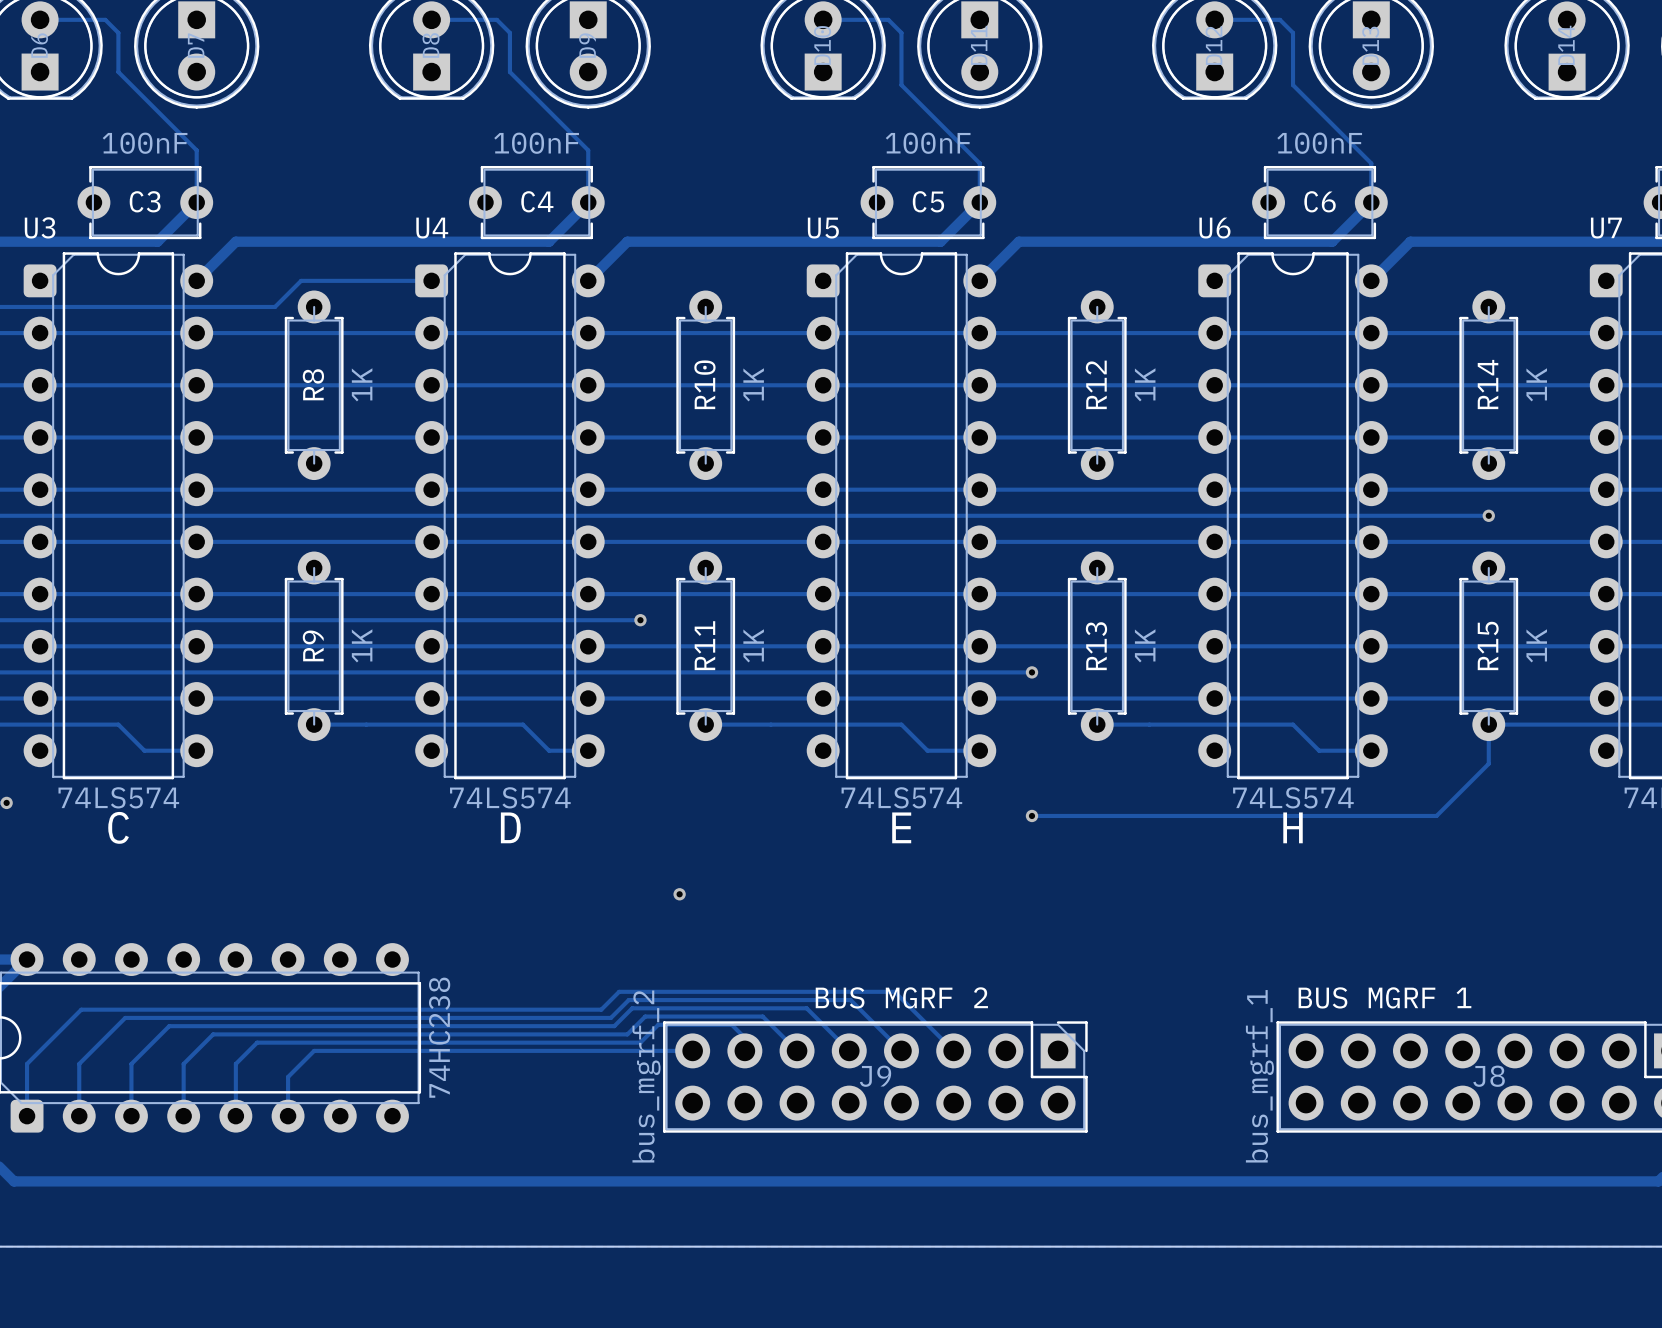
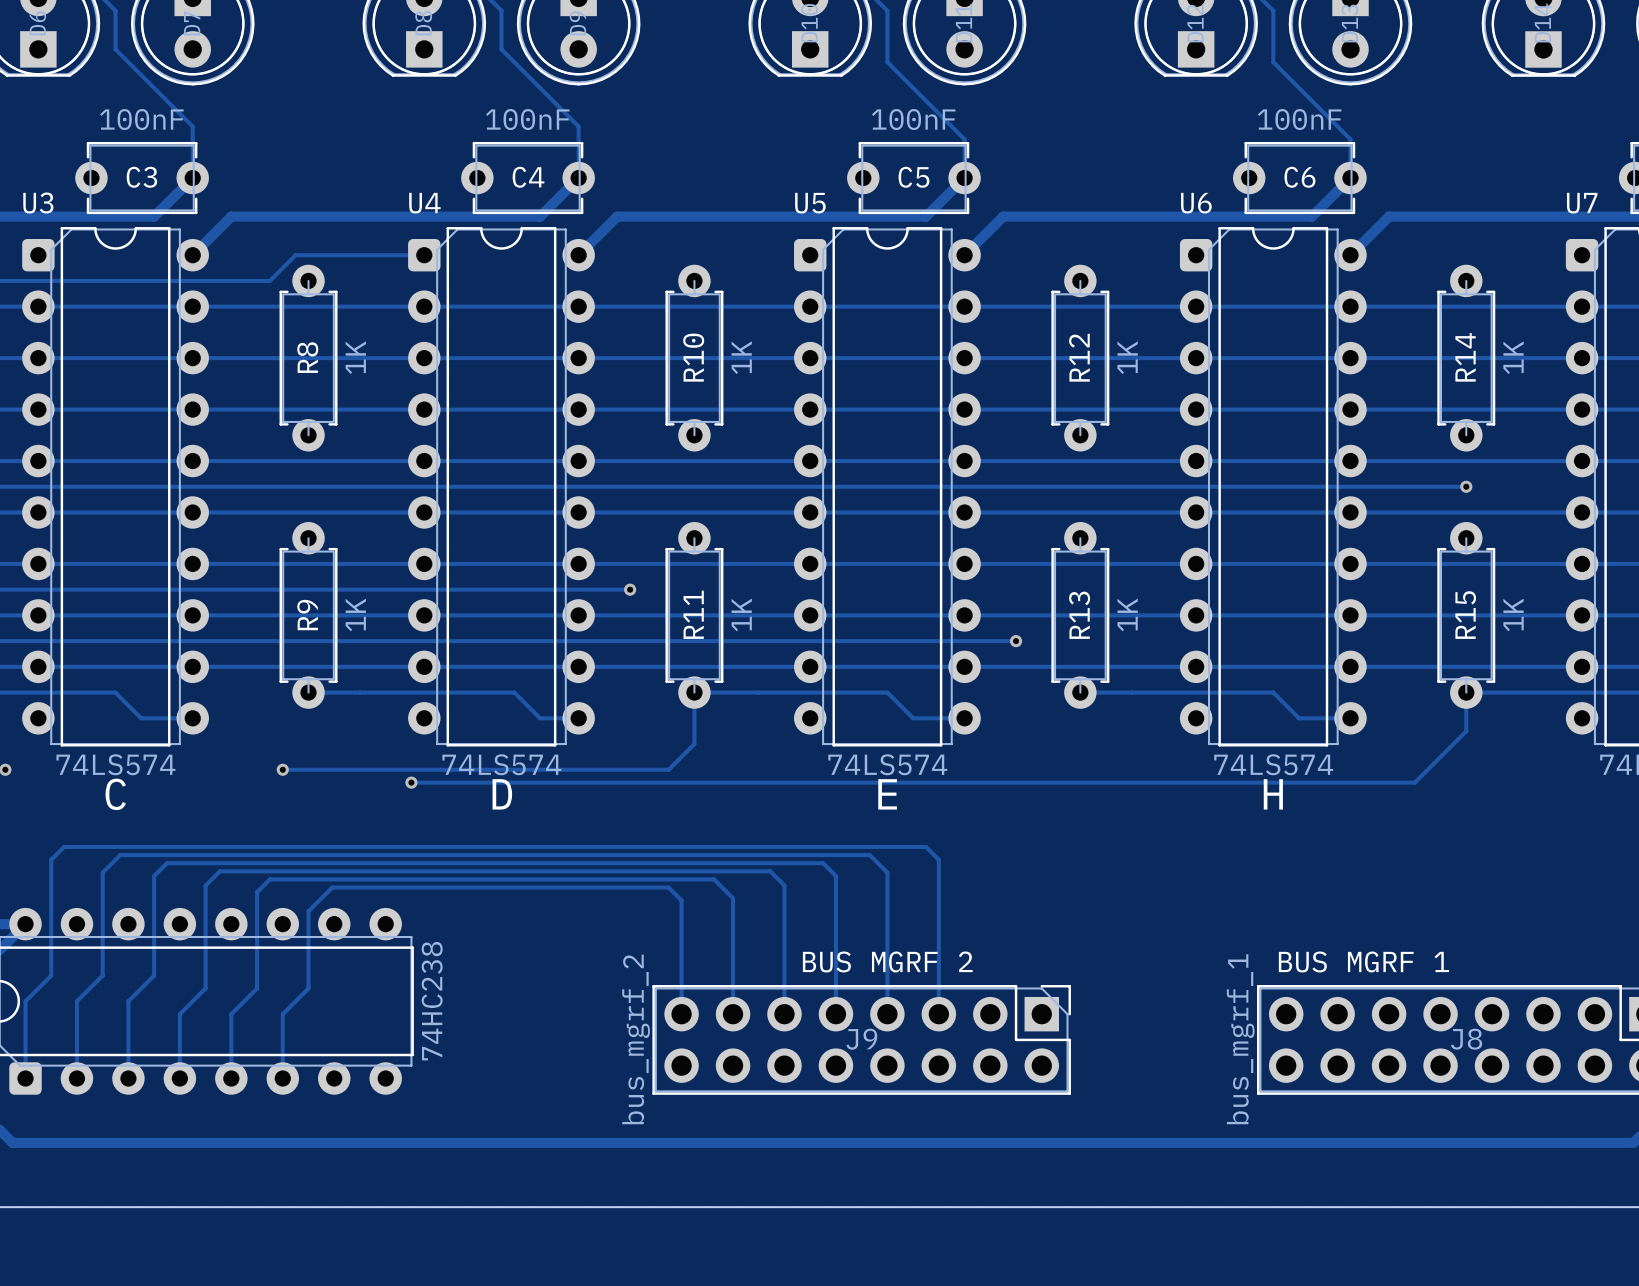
track: none -> (694, 692) (694, 744) (668, 769) (282, 769)
via: none -> (282, 769)
track: none -> (411, 782) (1016, 782)
via: none -> (411, 782)
via: (1031, 815) -> none
via: (679, 894) -> none
track: (744, 1037) (731, 1024) (658, 1024) (640, 1042) (257, 1042) (235, 1063) -> (733, 1001) (733, 898) (714, 879) (269, 879) (257, 892) (257, 988) (231, 1014) (231, 1027)
track: (692, 1050) (314, 1050) (288, 1076) -> (681, 1014) (681, 900) (668, 887) (332, 887) (308, 911) (308, 988) (282, 1014) (282, 1039)
track: (797, 1050) (762, 1016) (645, 1016) (627, 1034) (213, 1034) (183, 1063) -> (784, 1014) (784, 885) (770, 871) (219, 871) (205, 885) (205, 988) (179, 1014) (179, 1027)
track: (849, 1050) (806, 1008) (632, 1008) (614, 1026) (169, 1026) (131, 1063) -> (835, 1014) (835, 876) (823, 863) (167, 863) (154, 876) (154, 975) (128, 1001) (128, 1027)
track: (901, 1050) (850, 1000) (628, 1000) (610, 1017) (125, 1017) (79, 1063) -> (887, 1014) (887, 872) (869, 855) (120, 855) (102, 872) (102, 975) (76, 1001) (76, 1027)
track: (953, 1050) (894, 991) (619, 991) (601, 1009) (81, 1009) (27, 1063) -> (938, 1014) (938, 859) (926, 846) (64, 846) (51, 859) (51, 975) (25, 1001) (25, 1027)

